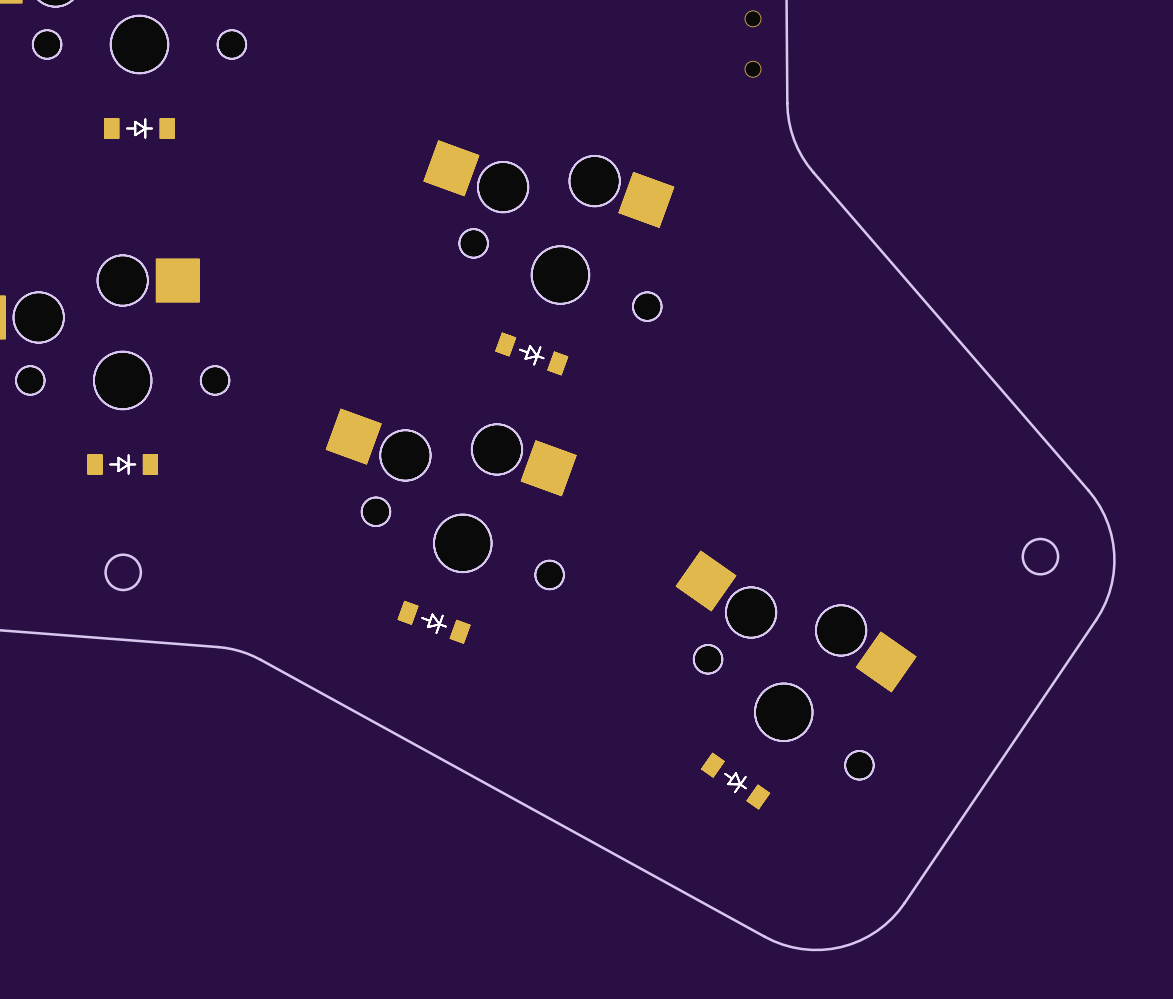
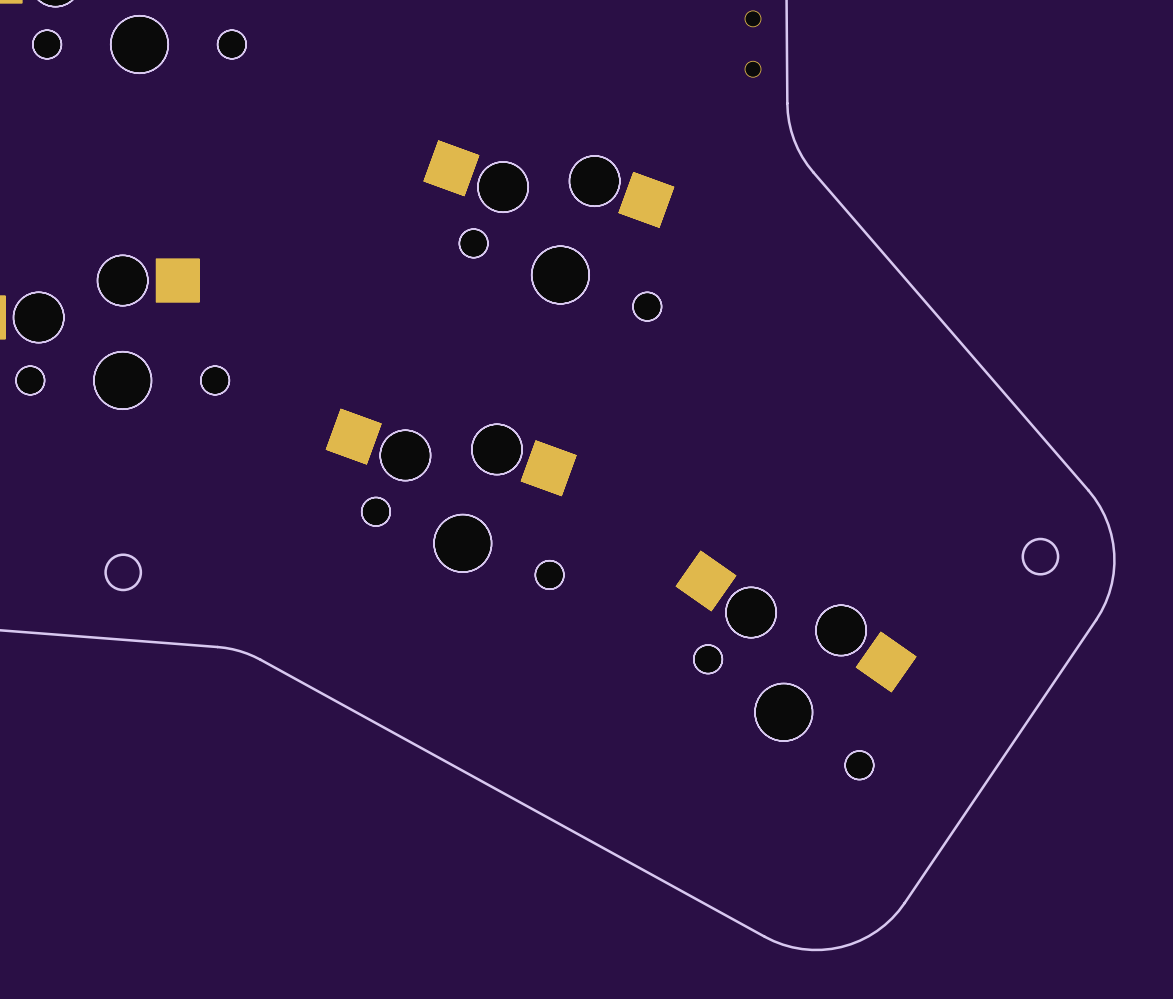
part: (139, 128) -> none
part: (531, 353) -> none
part: (122, 464) -> none
part: (434, 622) -> none
part: (735, 781) -> none

